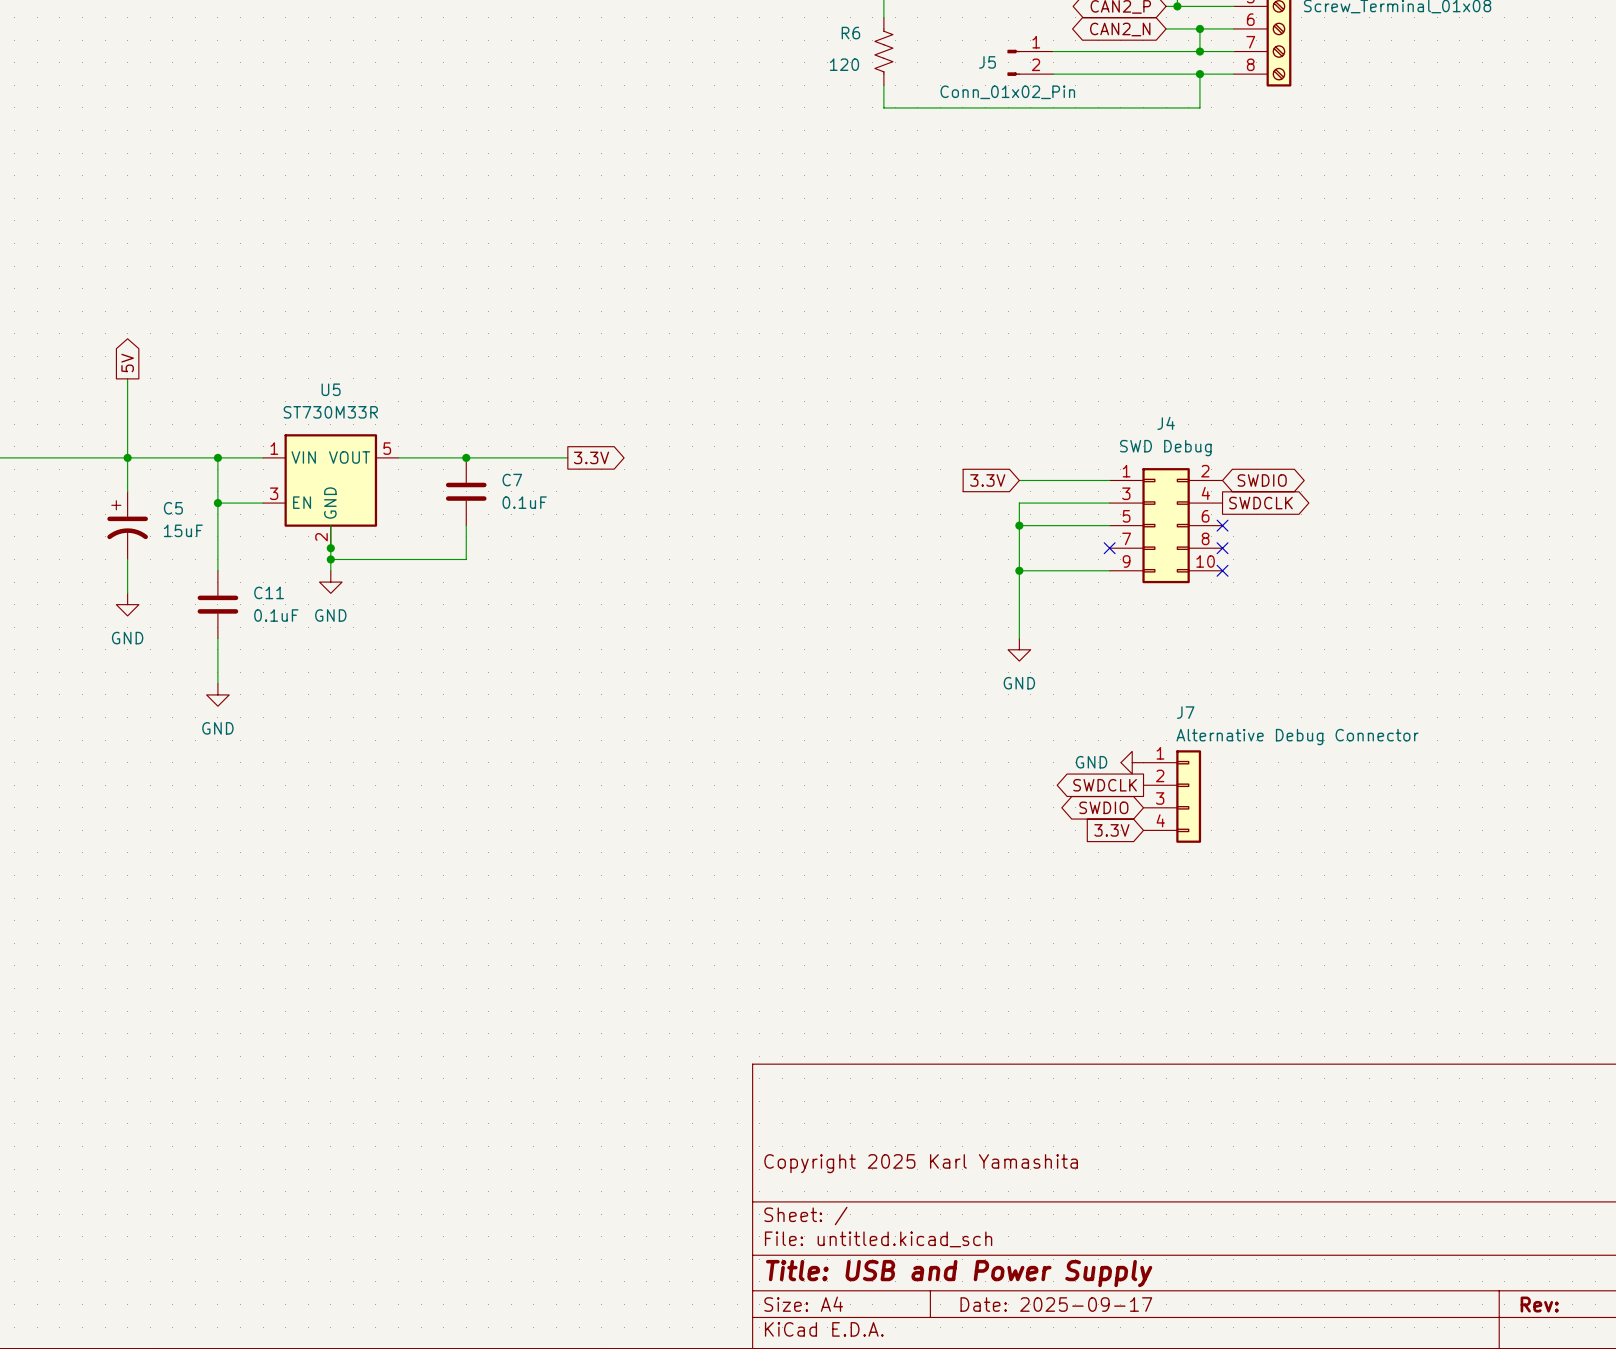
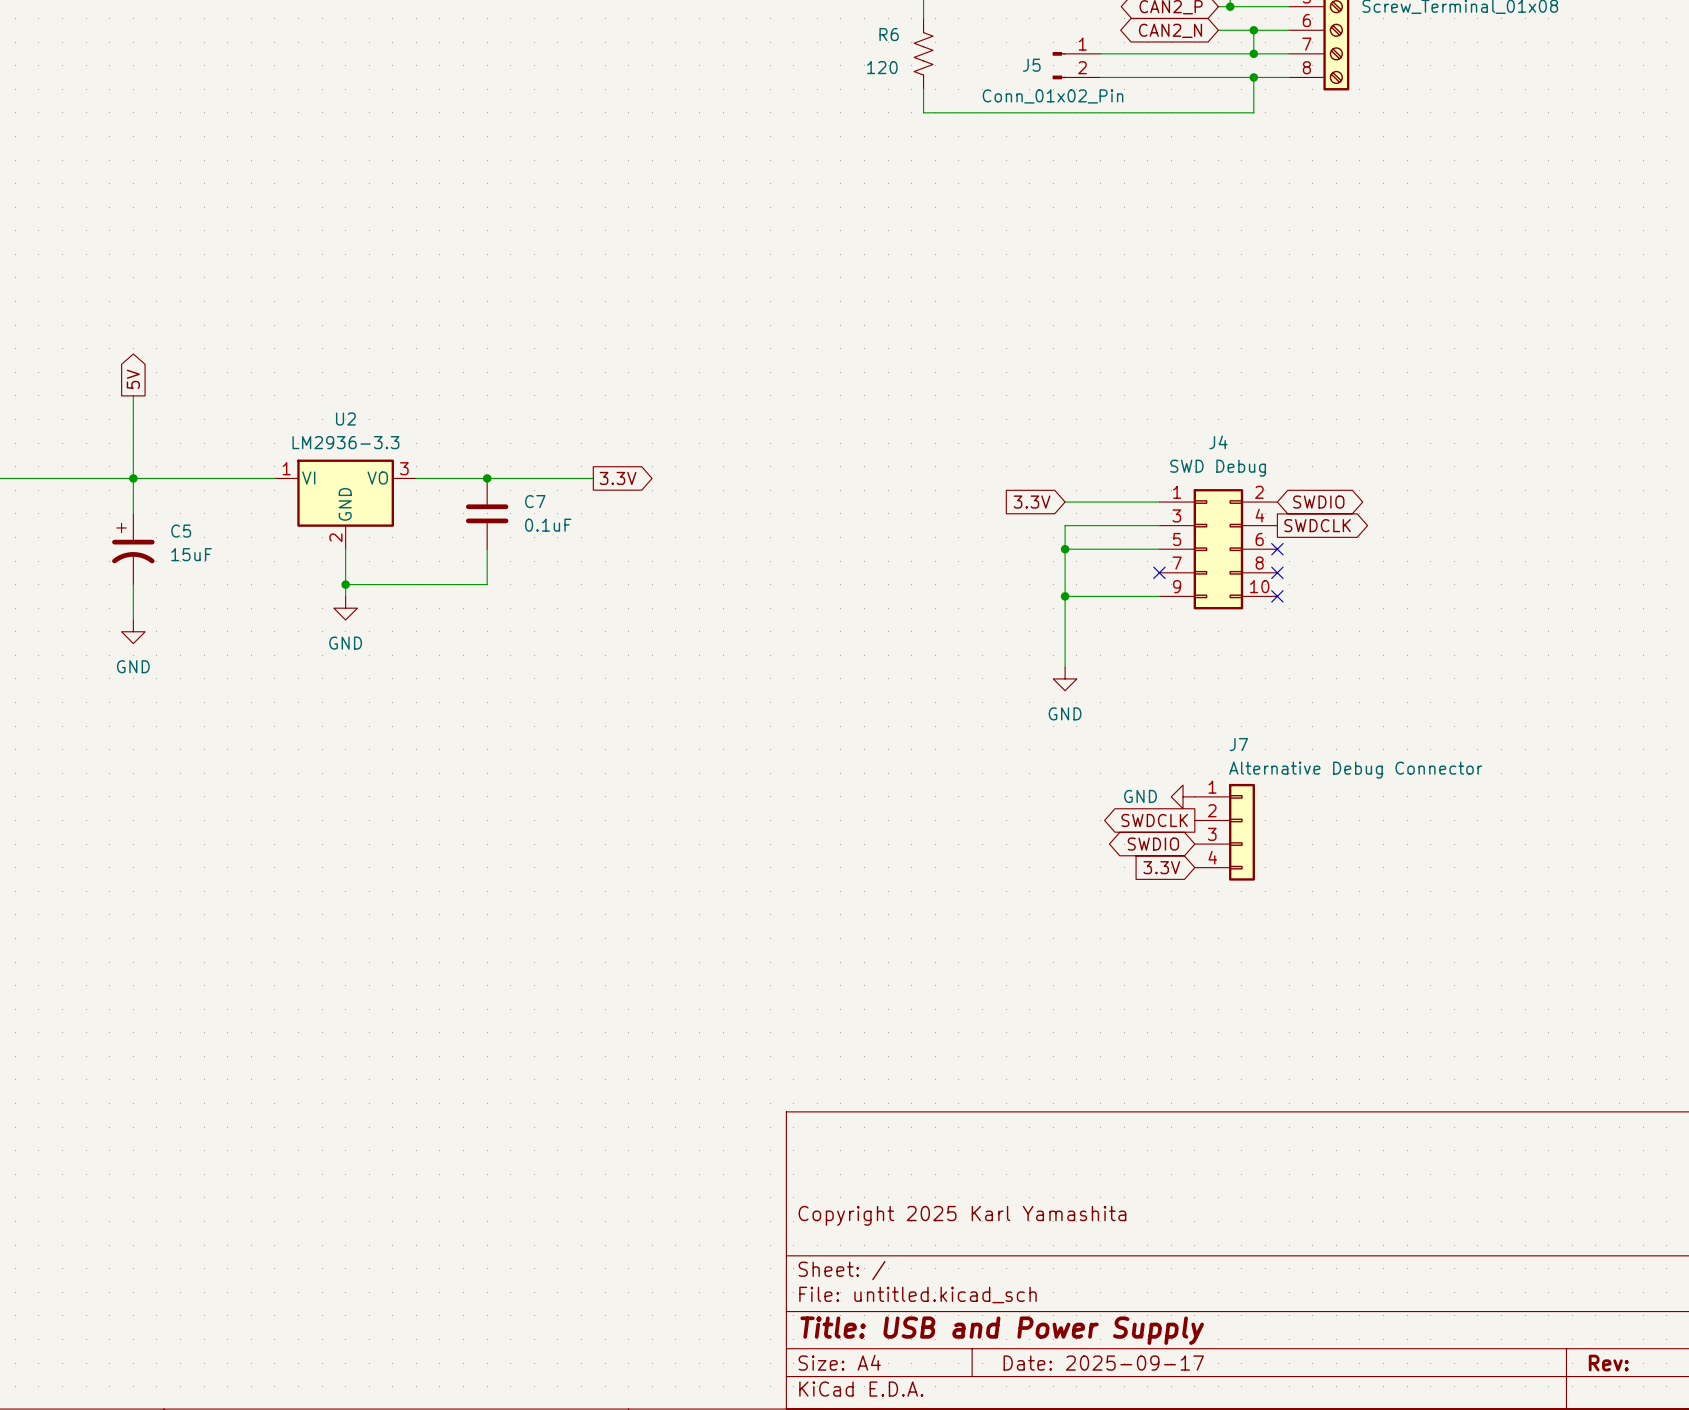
wire: (217, 457) (217, 570) -> none
junction: (217, 457) -> none
U2: none -> LM2936-3.3 (345, 504)
U5: ST730M33R (330, 491) -> none
wire: (217, 503) (263, 503) -> none
junction: (217, 503) -> none
junction: (330, 548) -> none
C11: 0.1uF (217, 604) -> none
wire: (217, 638) (217, 683) -> none
power symbol: GND (217, 694) -> none

